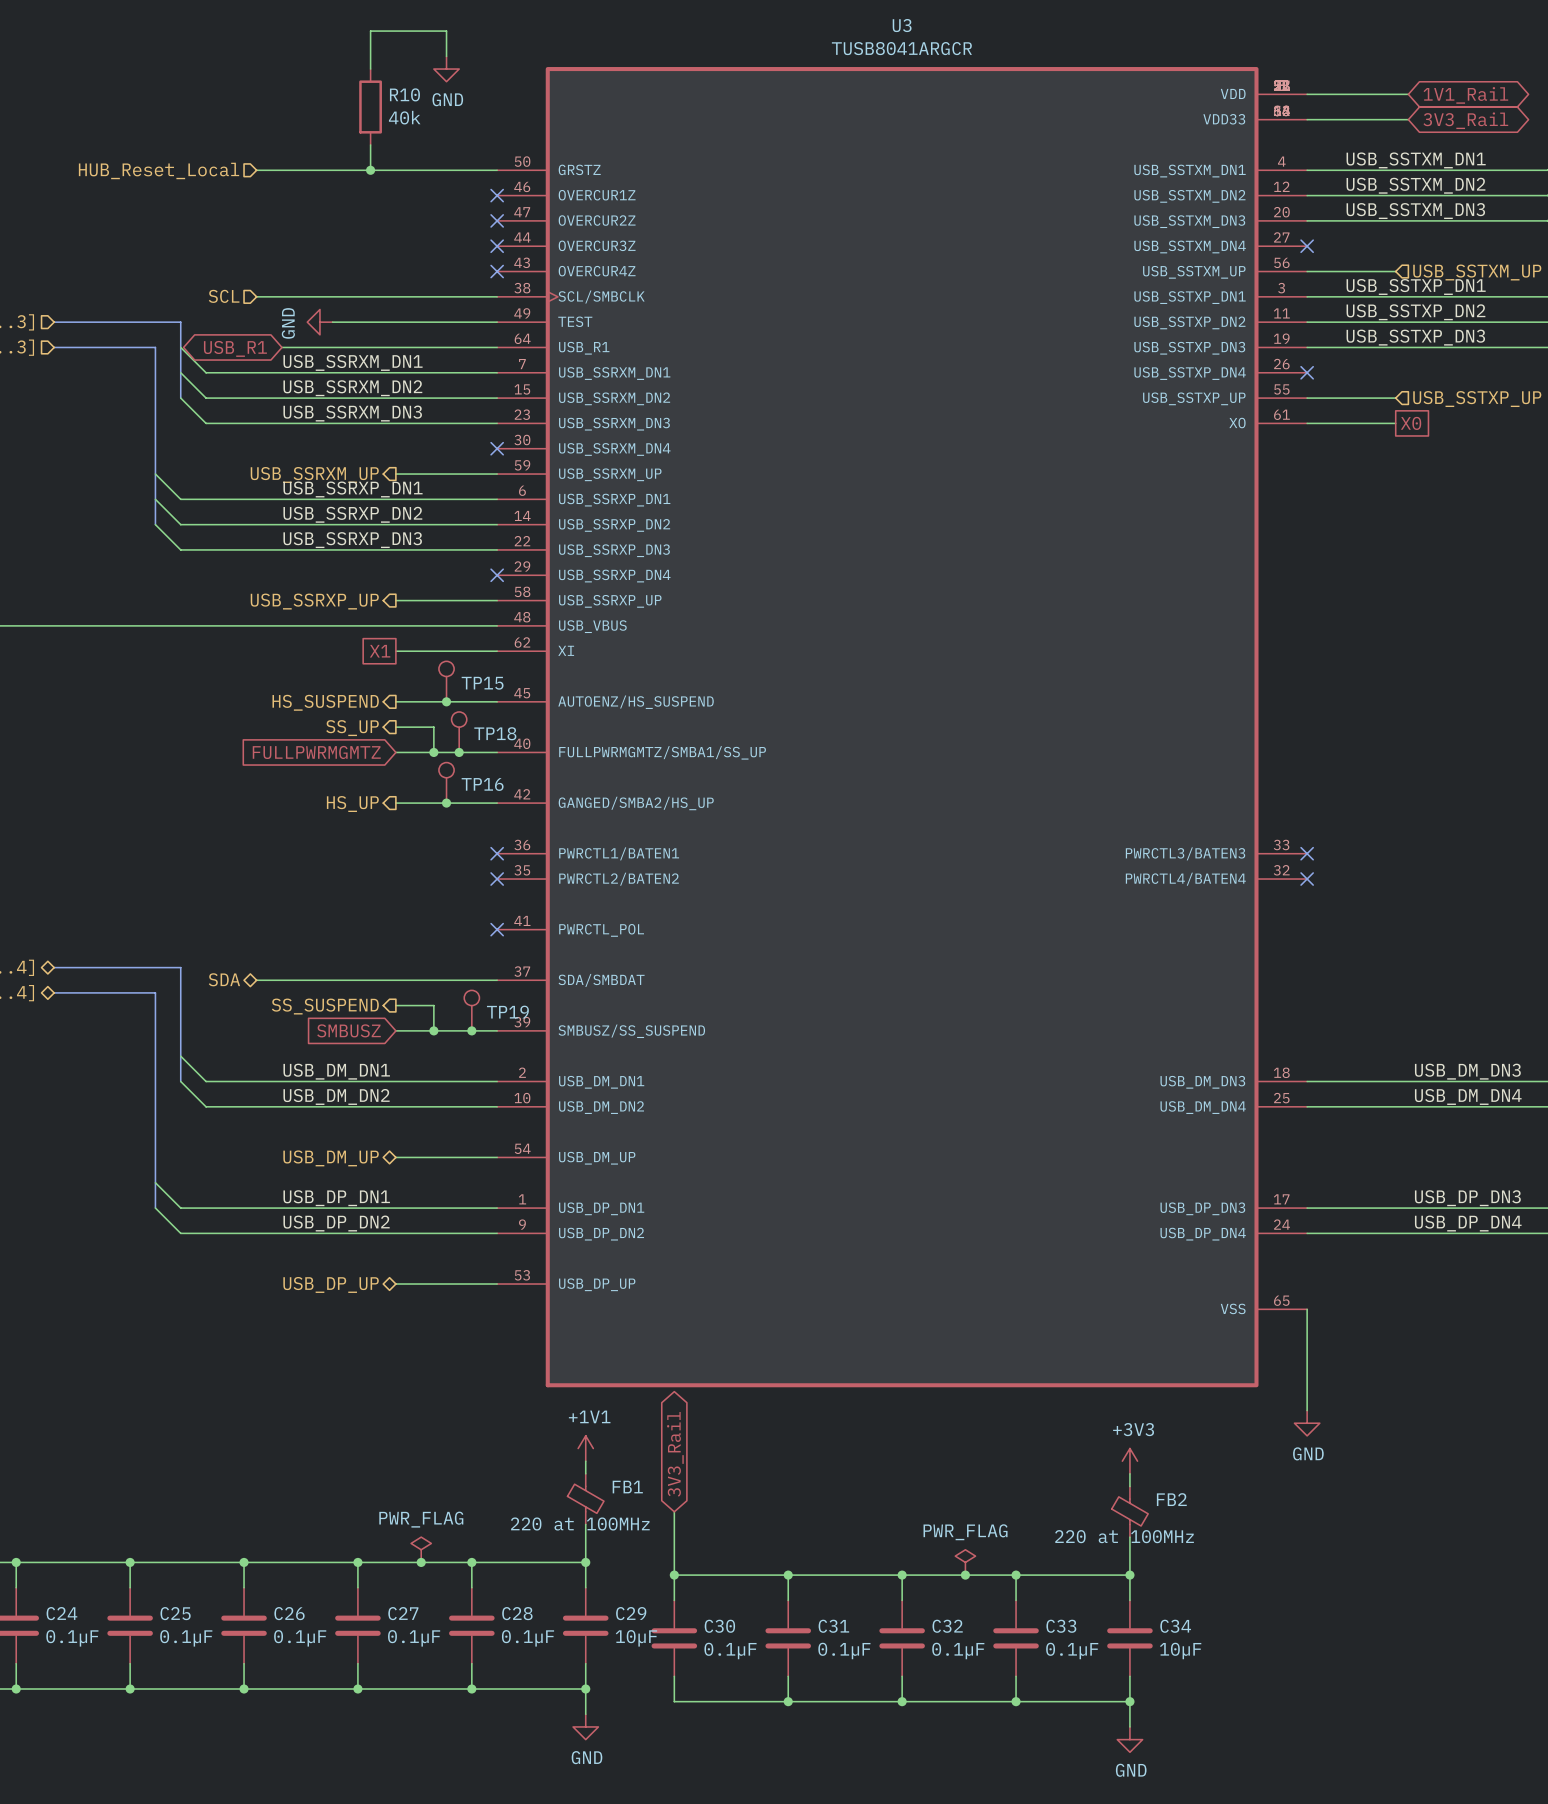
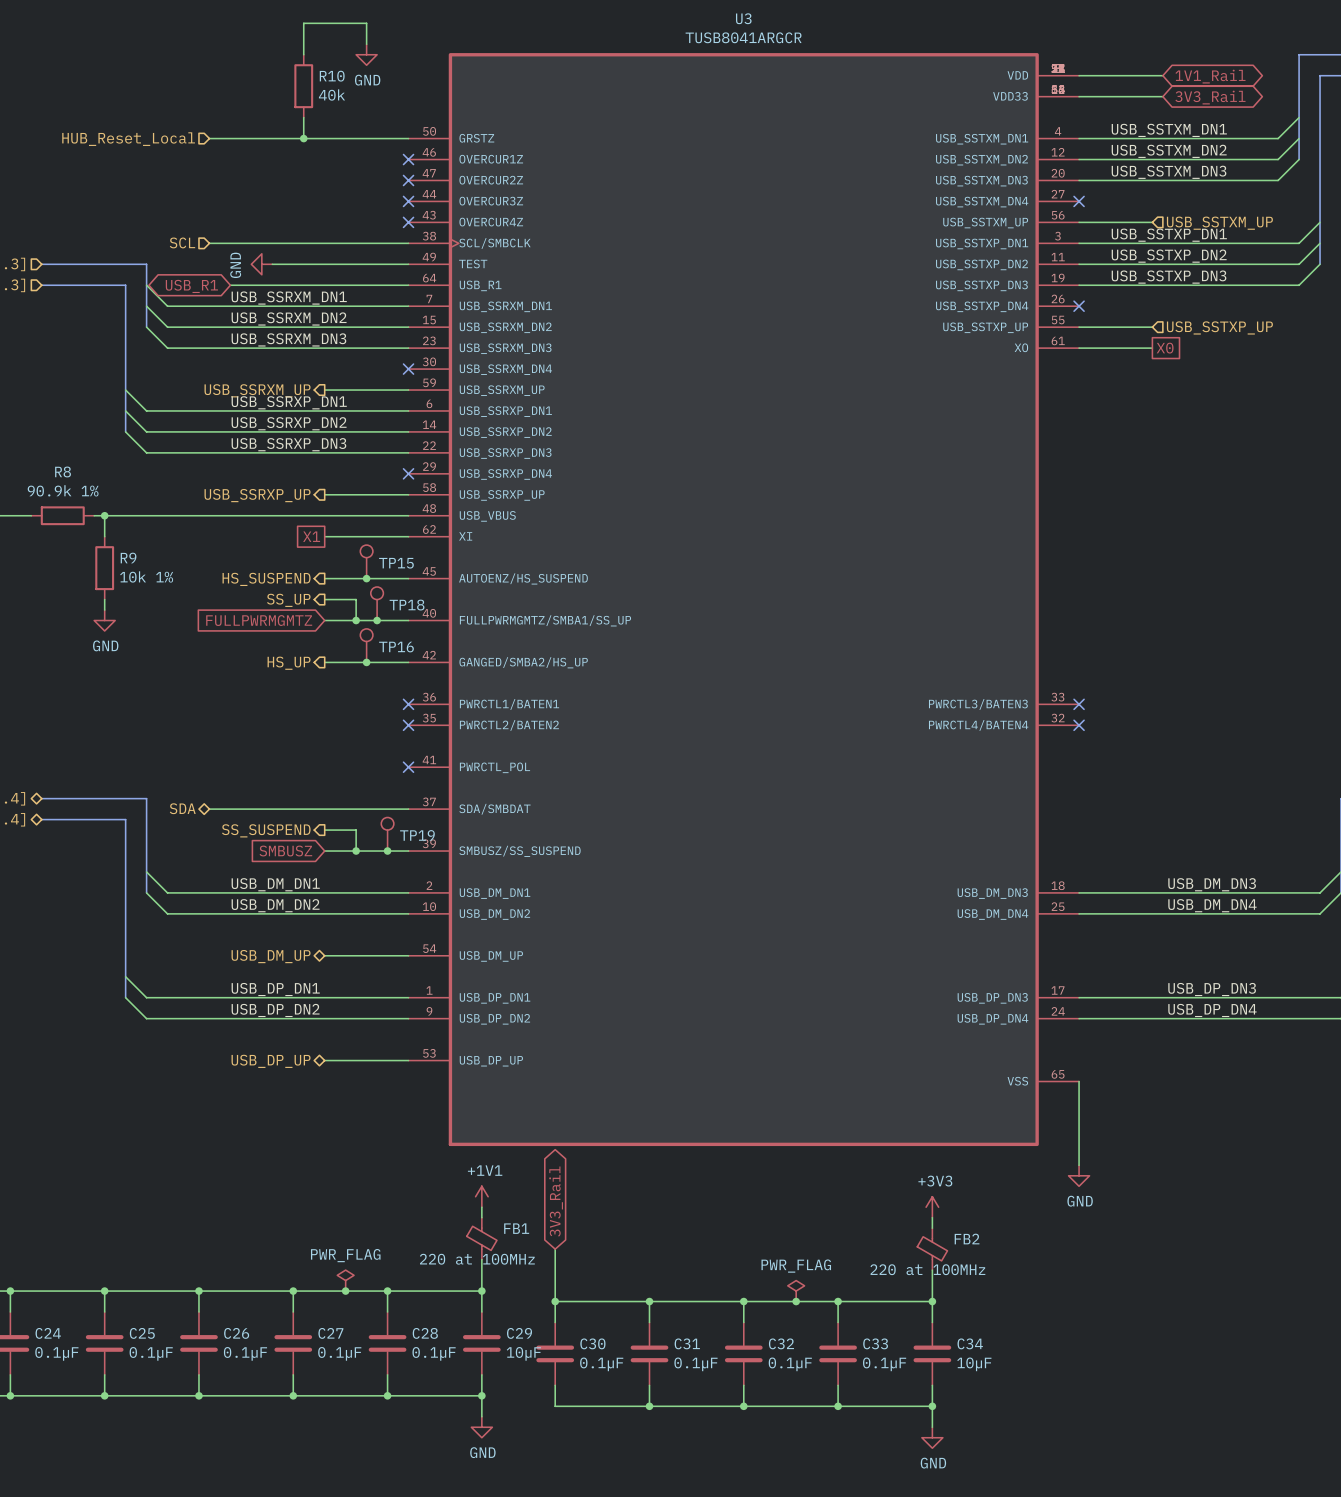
wire: (41, 625) (117, 625) -> none
R8: none -> 90.9k 1% (62, 515)
wire: none -> (104, 515) (104, 536)
junction: none -> (104, 515)
R9: none -> 10k 1% (104, 568)
wire: none -> (104, 599) (104, 610)
power symbol: none -> GND (104, 620)

